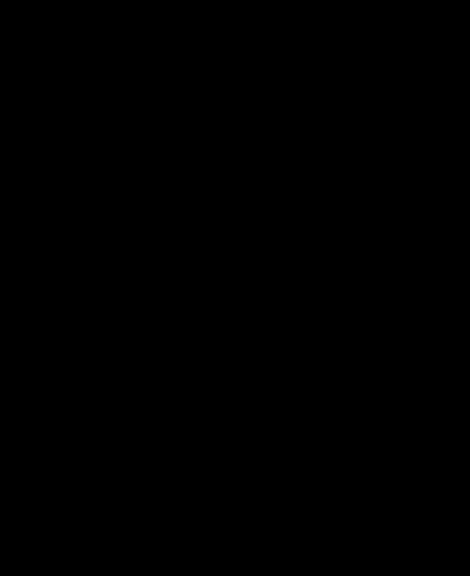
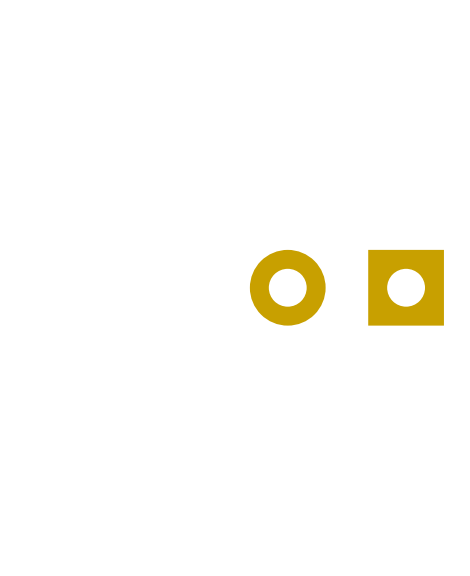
part: none -> (346, 287)

